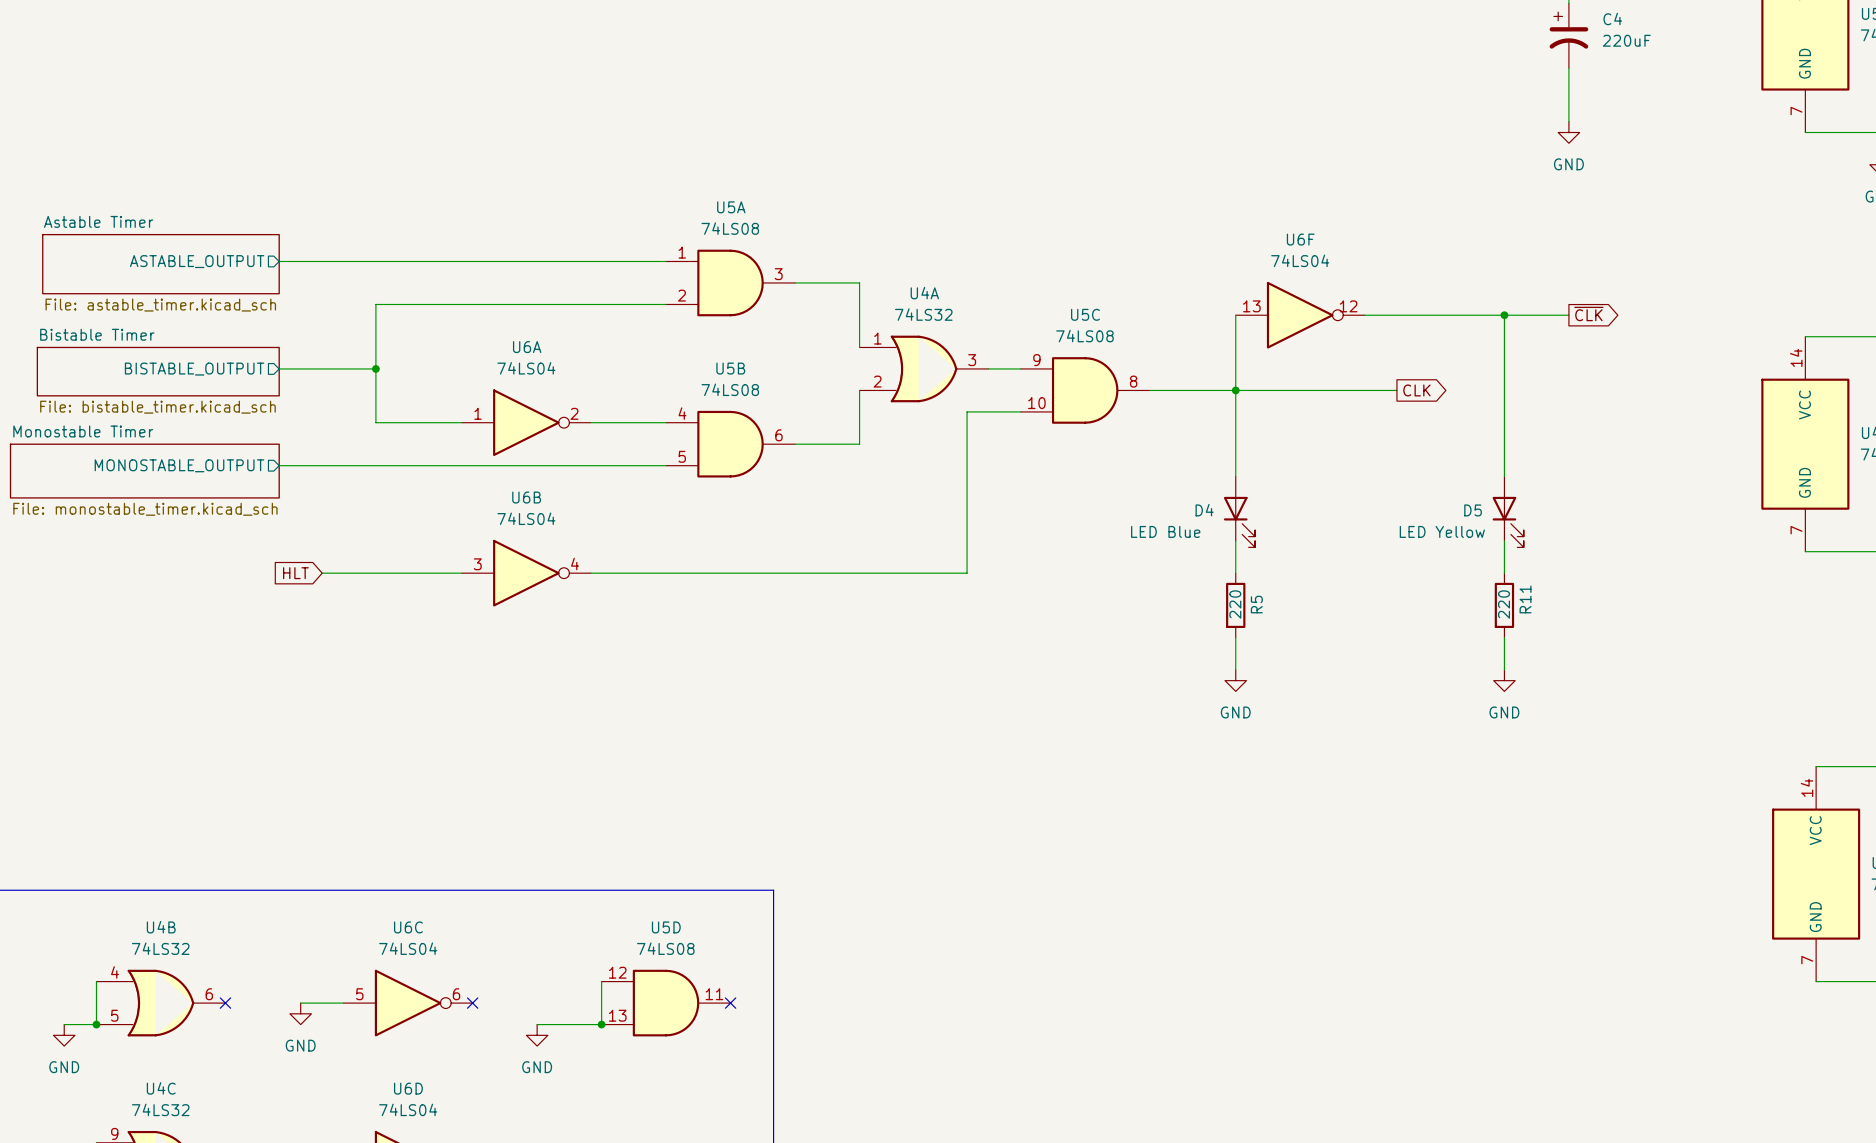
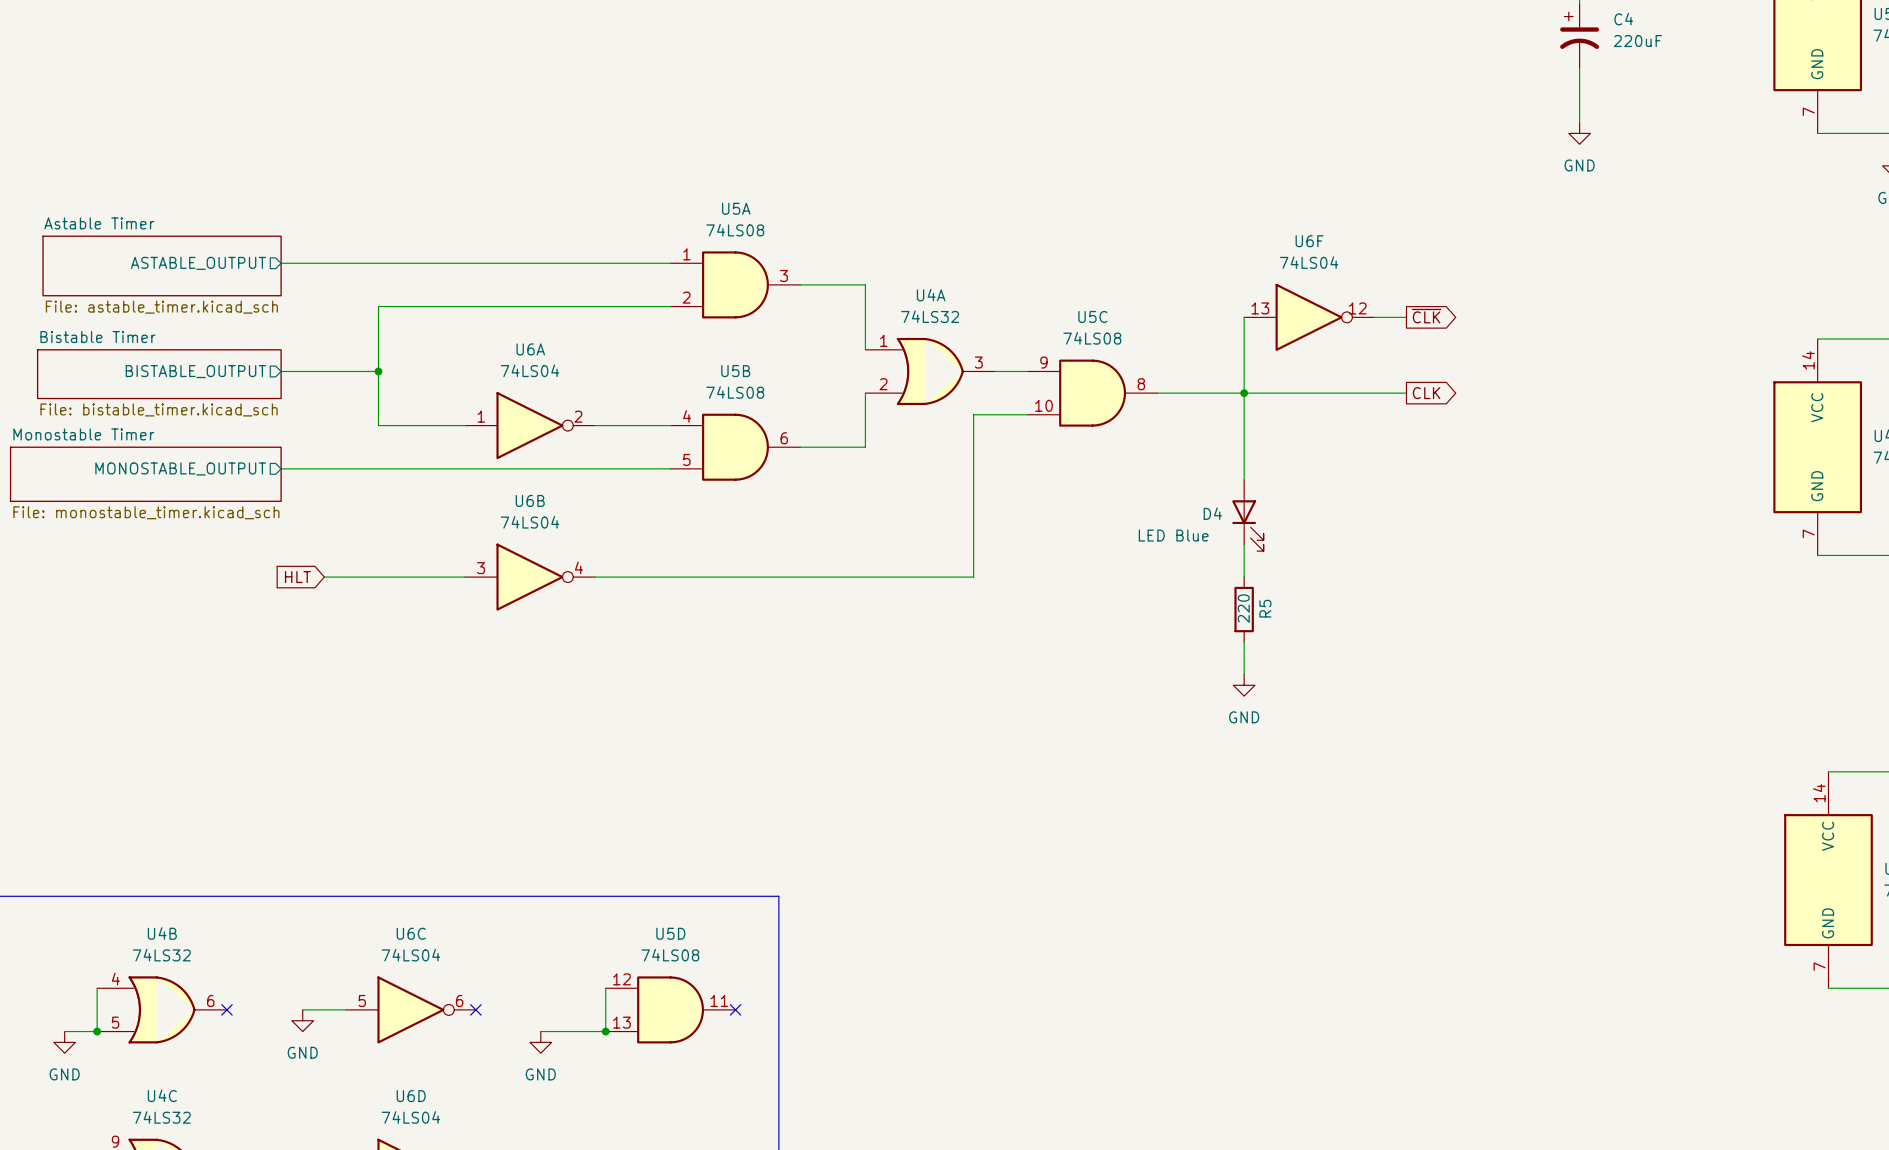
global label position: ~{CLK} (1588, 313) -> ~{CLK} (1426, 316)
wire: (1396, 315) (1568, 315) -> none
wire: (1504, 315) (1504, 476) -> none
junction: (1504, 315) -> none
D5: LED Yellow (1508, 511) -> none
wire: (1504, 540) (1504, 573) -> none
R11: 220 (1504, 605) -> none
wire: (1504, 637) (1504, 669) -> none
power symbol: GND (1504, 680) -> none

